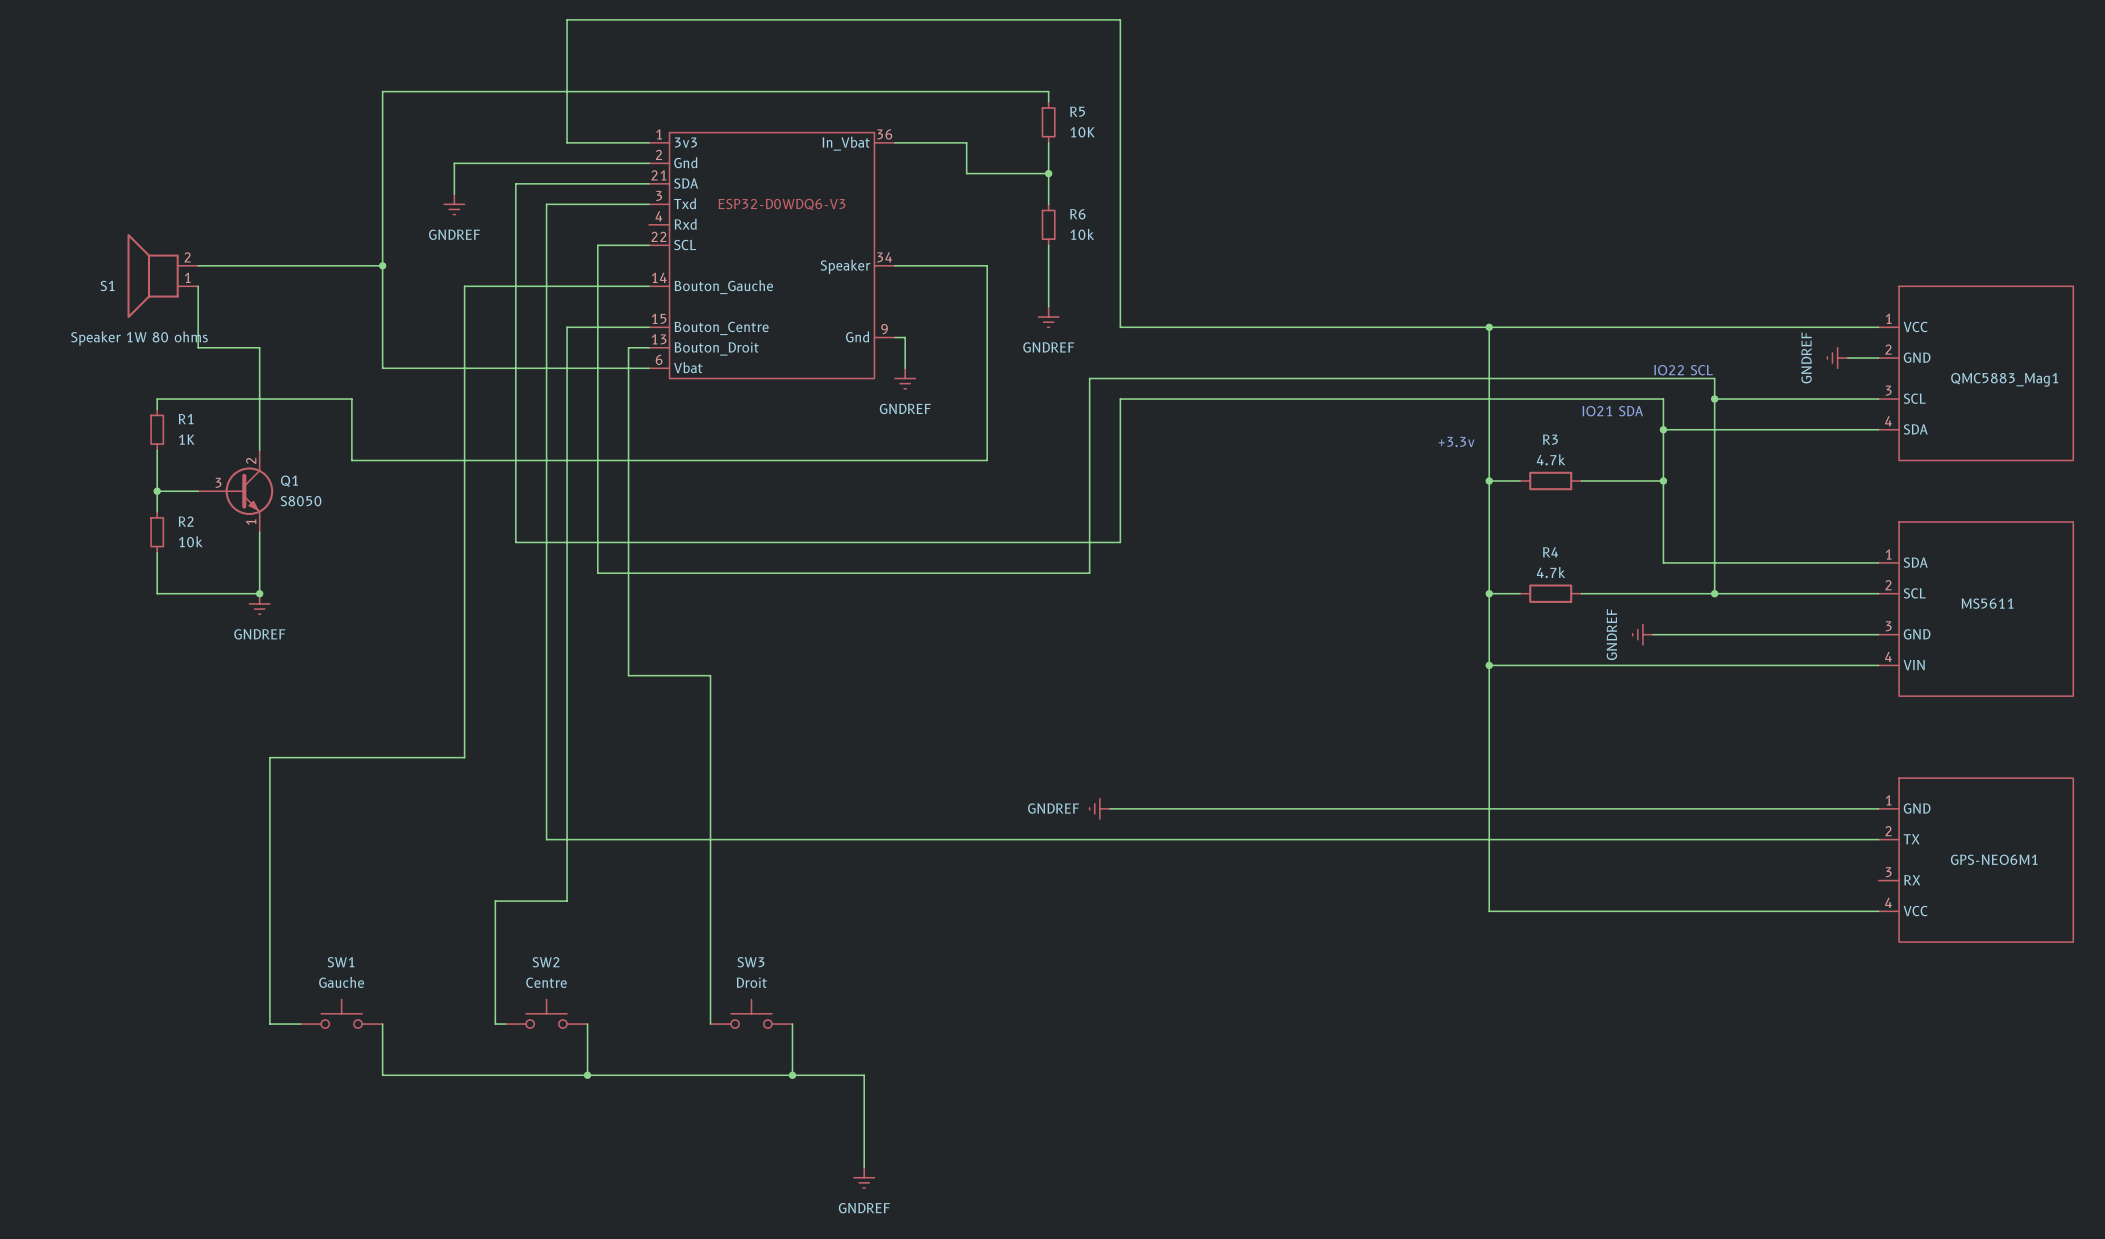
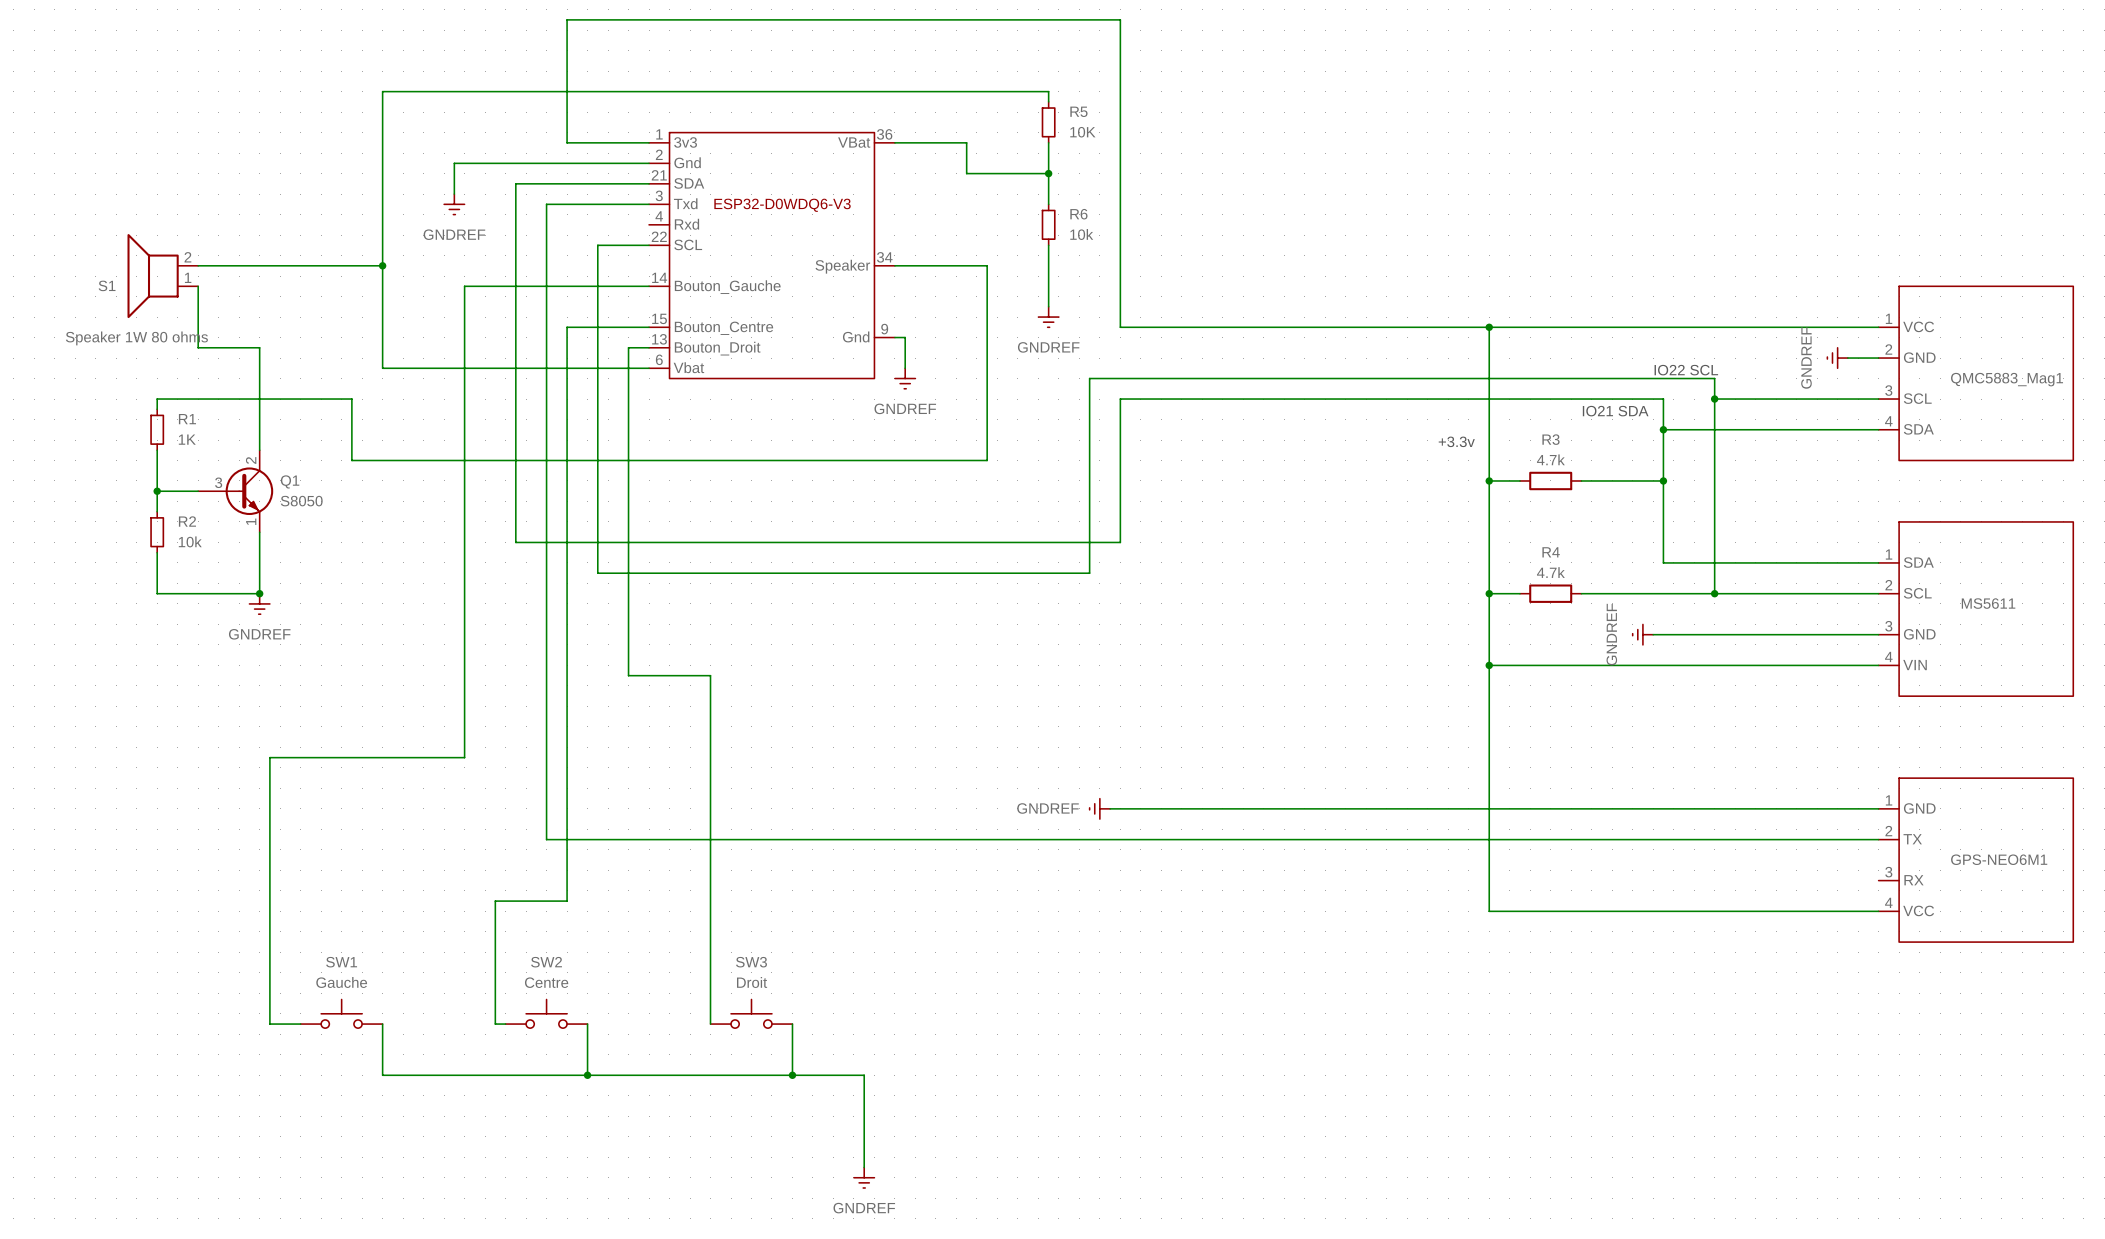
part pin name: In_Vbat (846, 143) -> VBat (854, 142)

